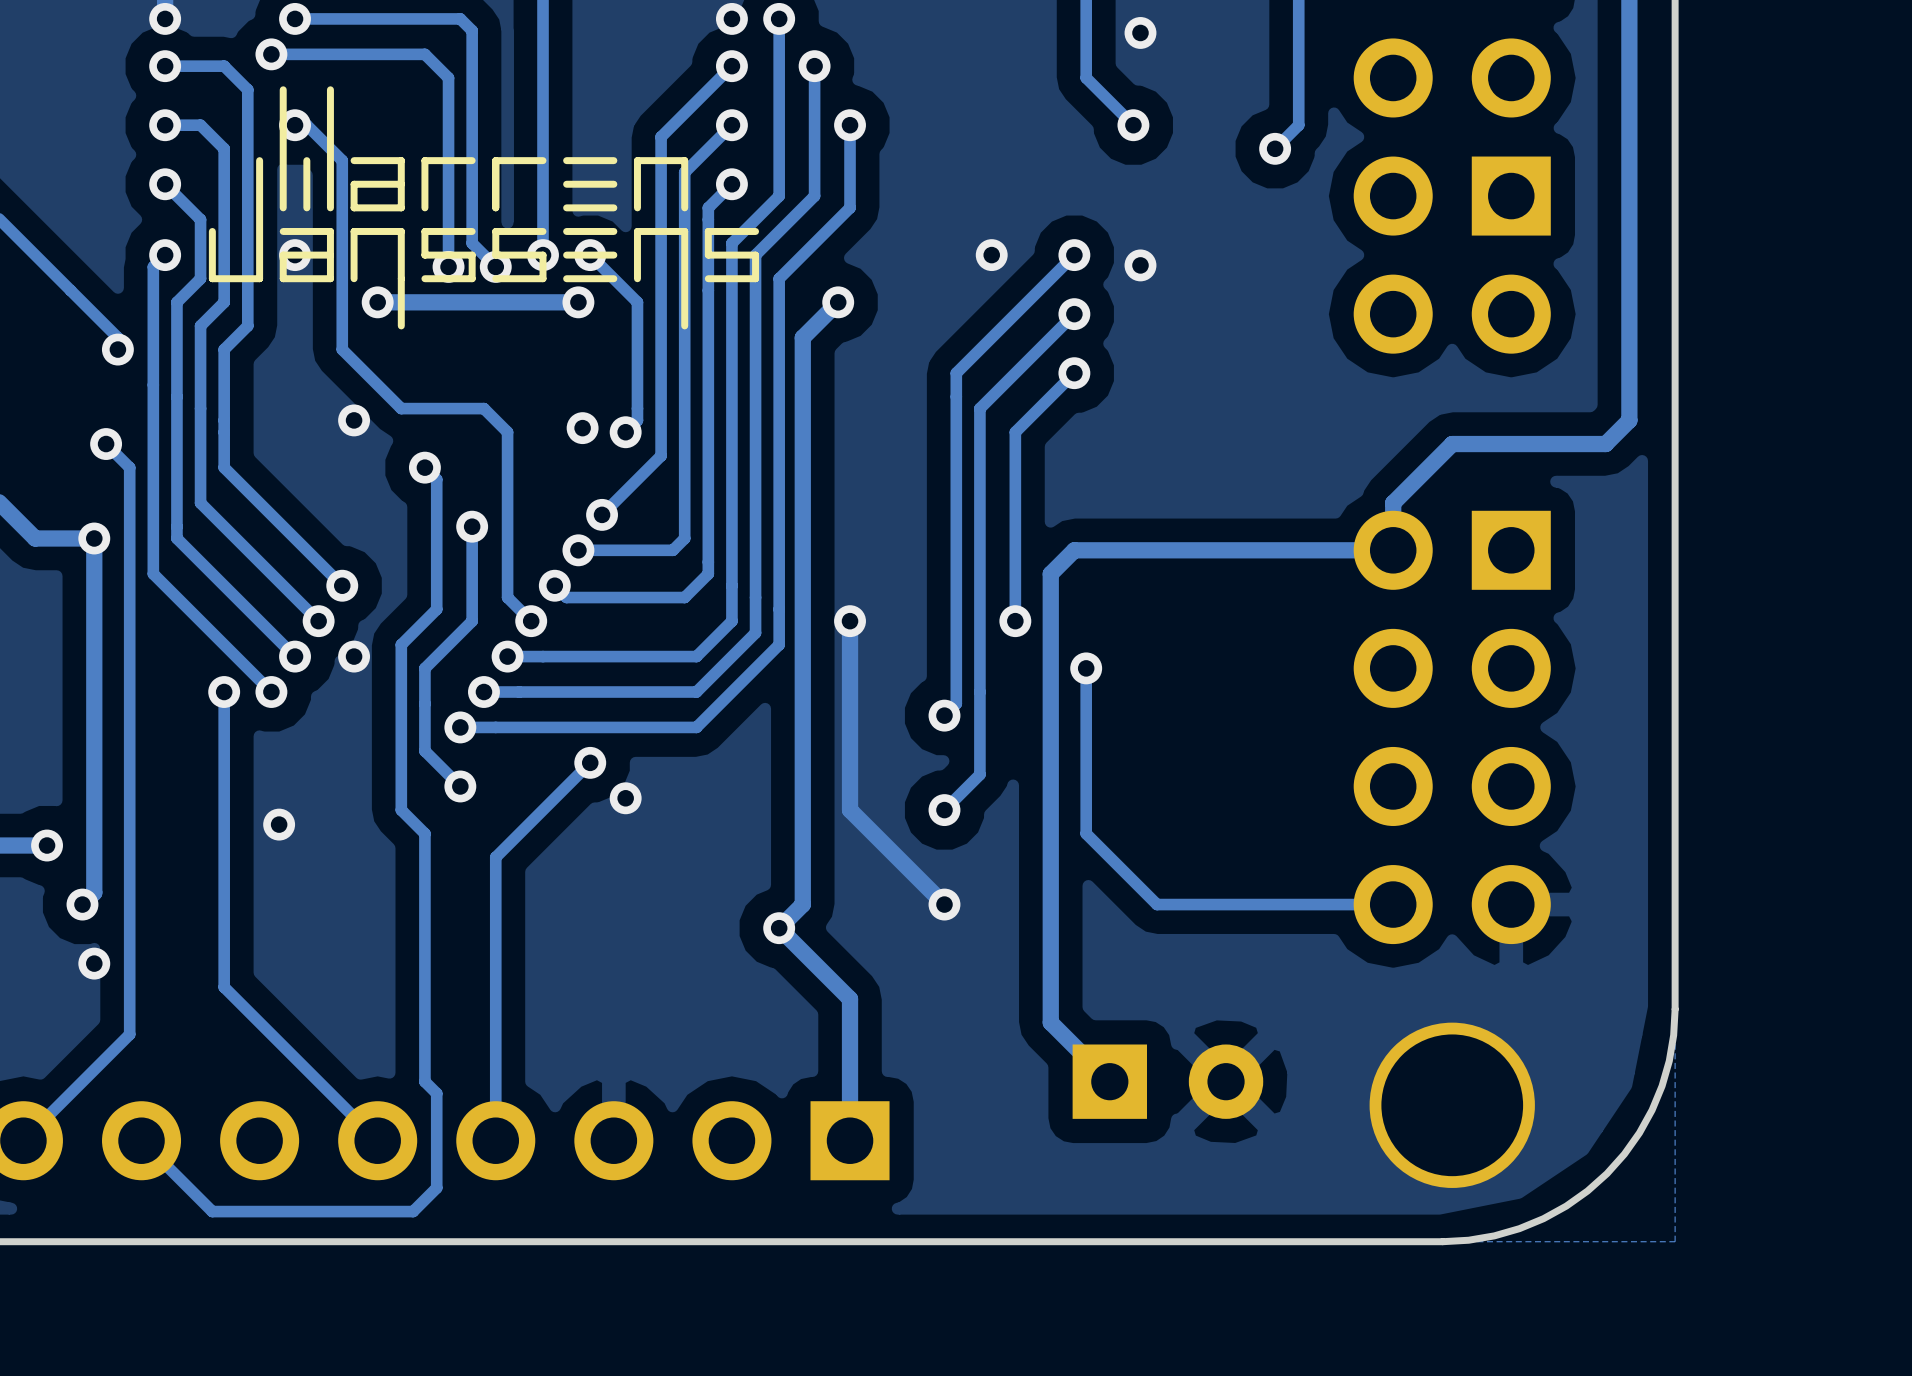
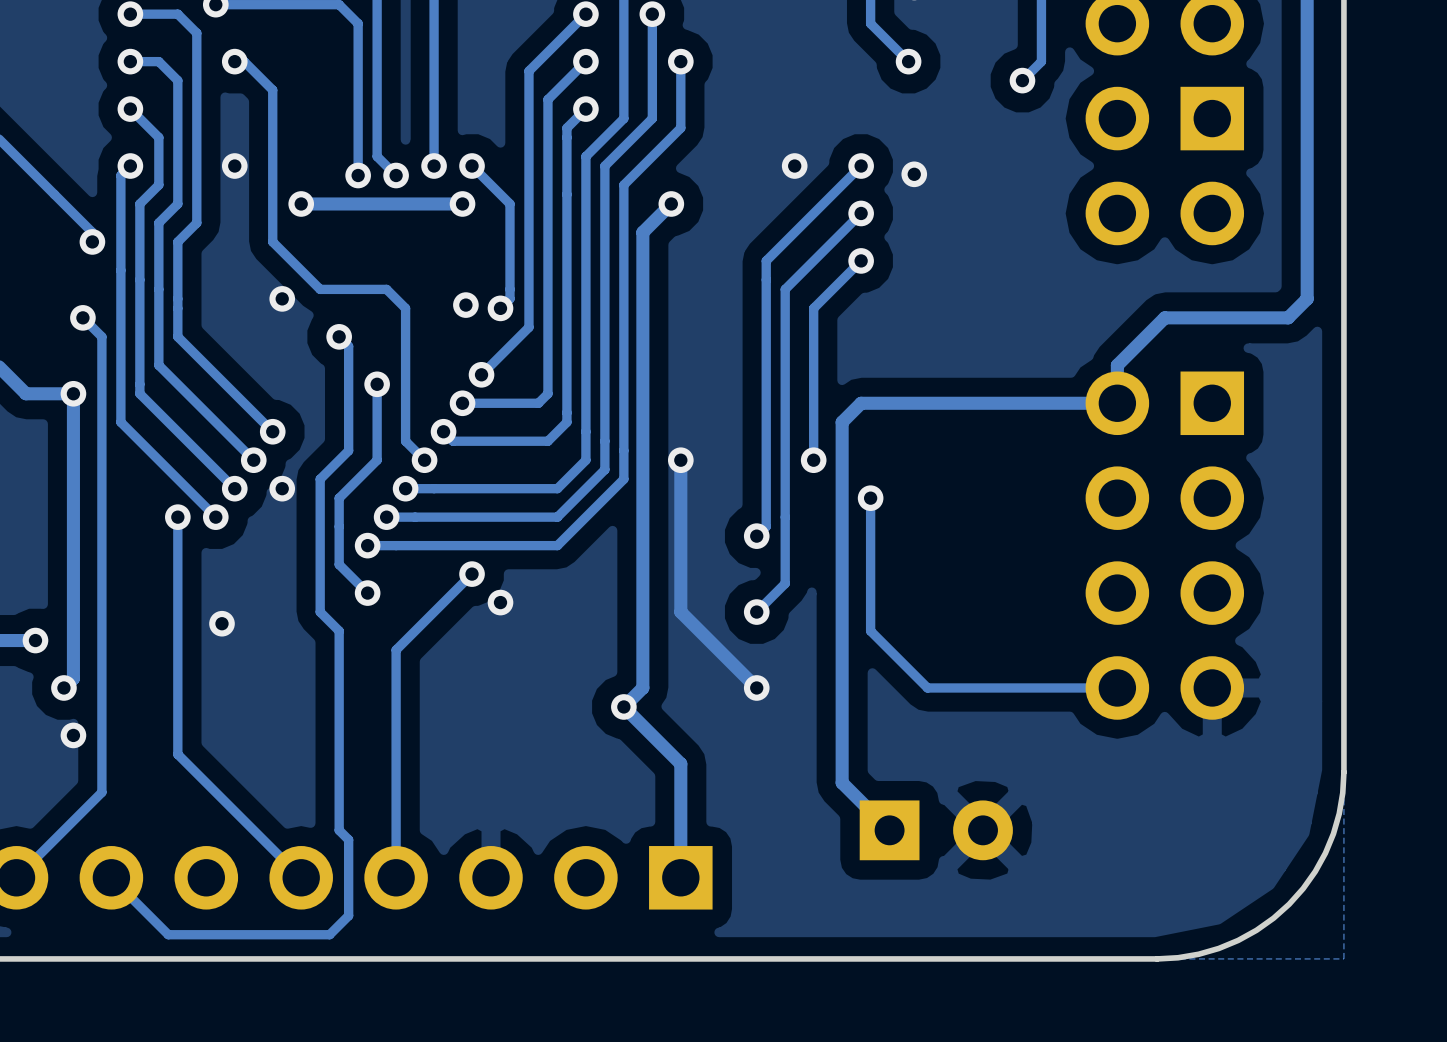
drawing: [208, 86, 760, 330] -> none
part: (1452, 1105) -> none

